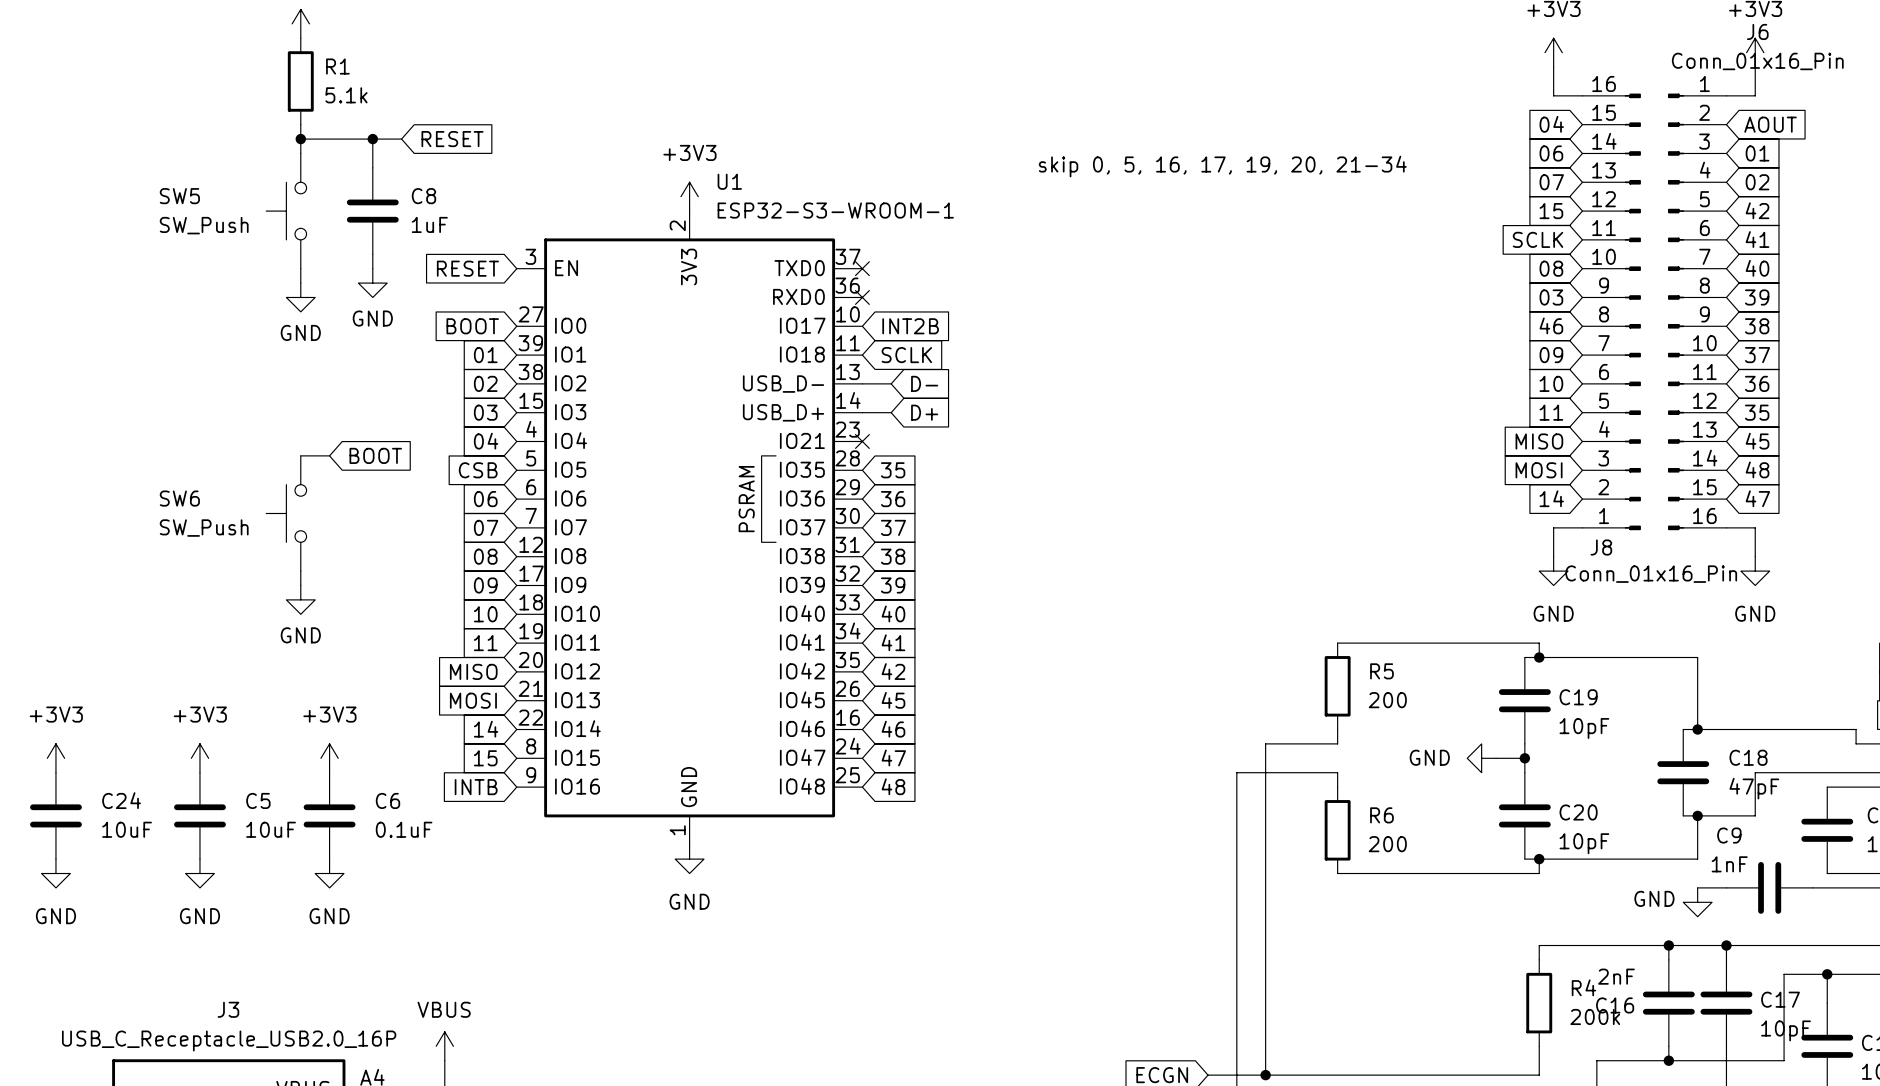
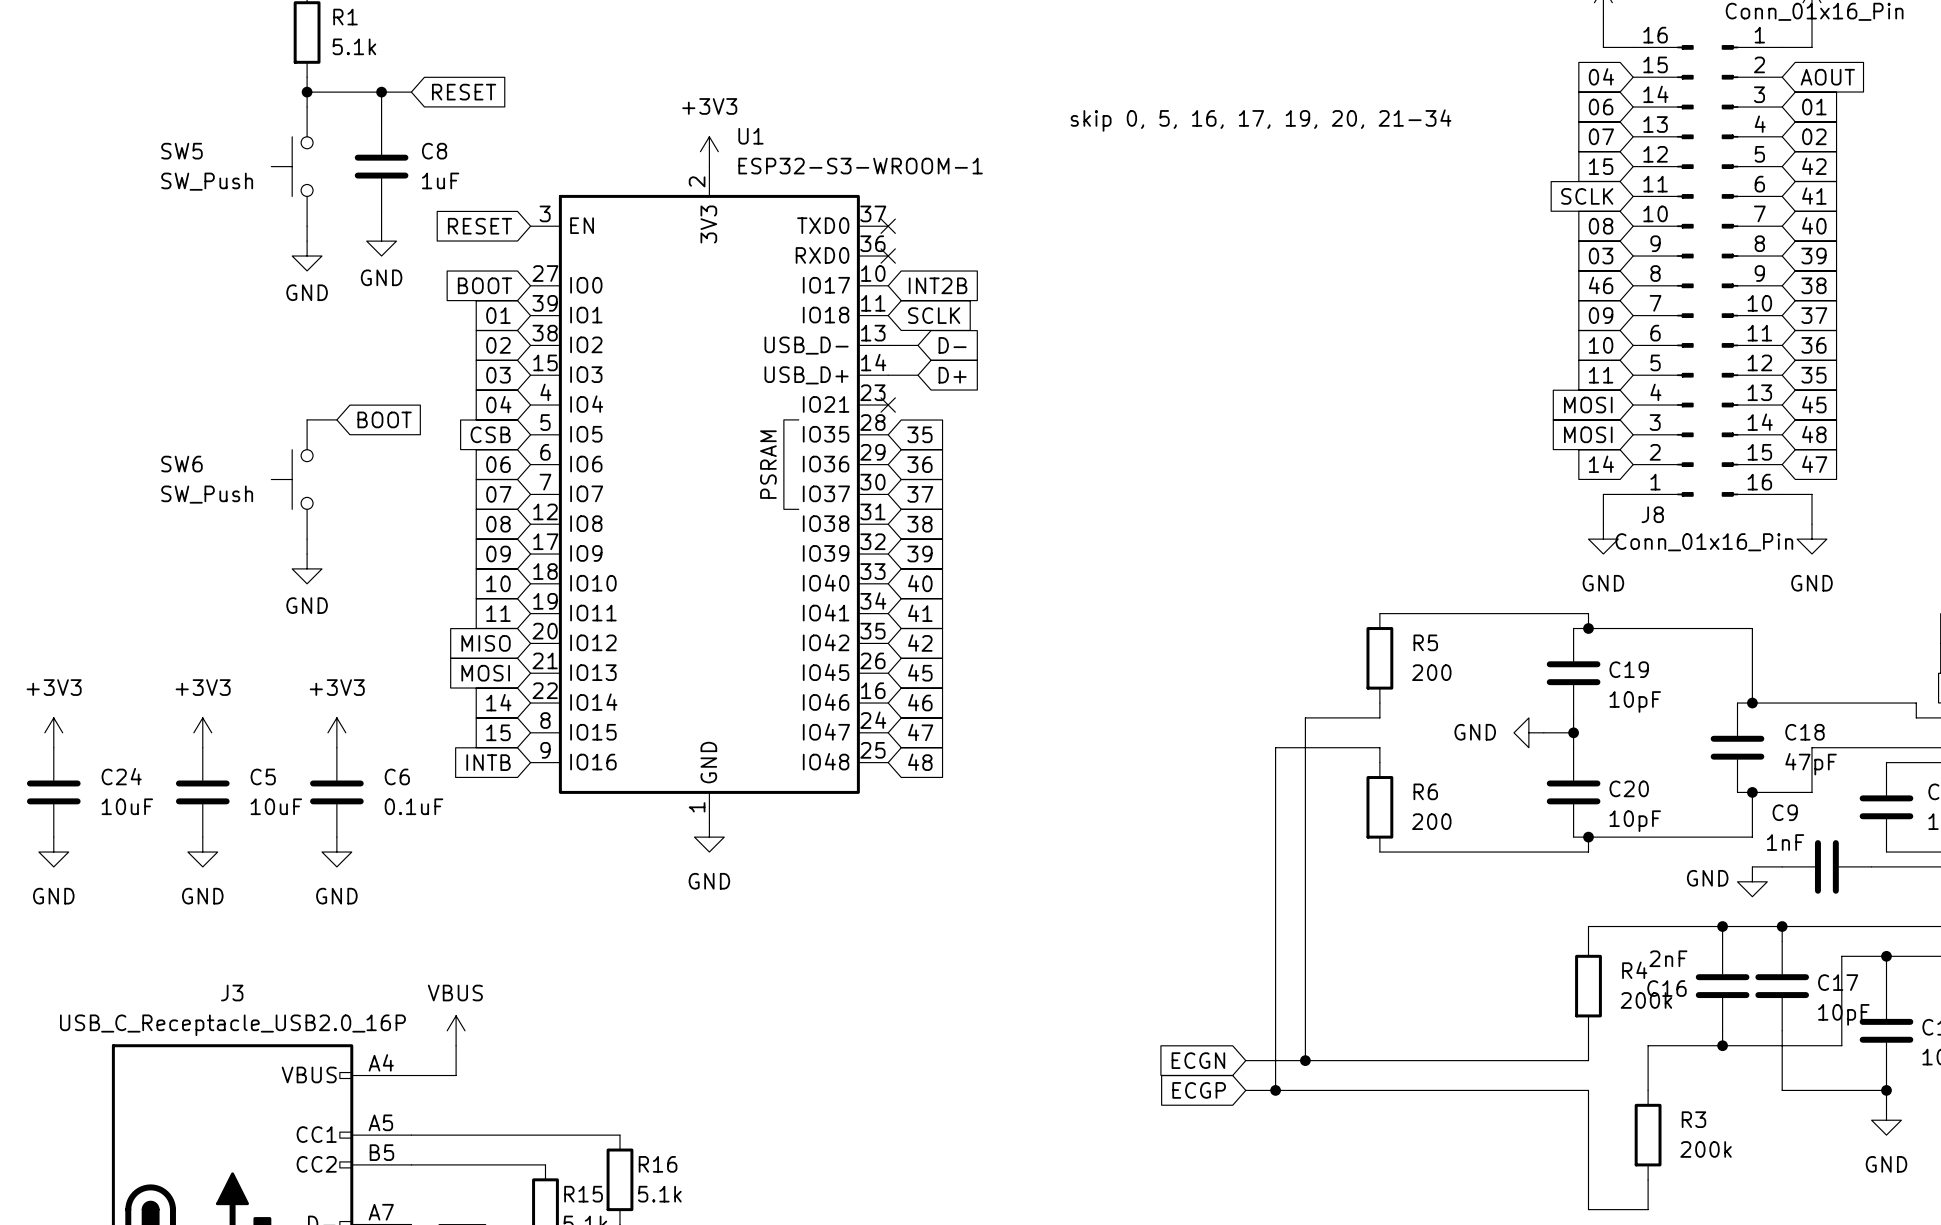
global label: MISO (1539, 441) -> MOSI (1588, 405)

